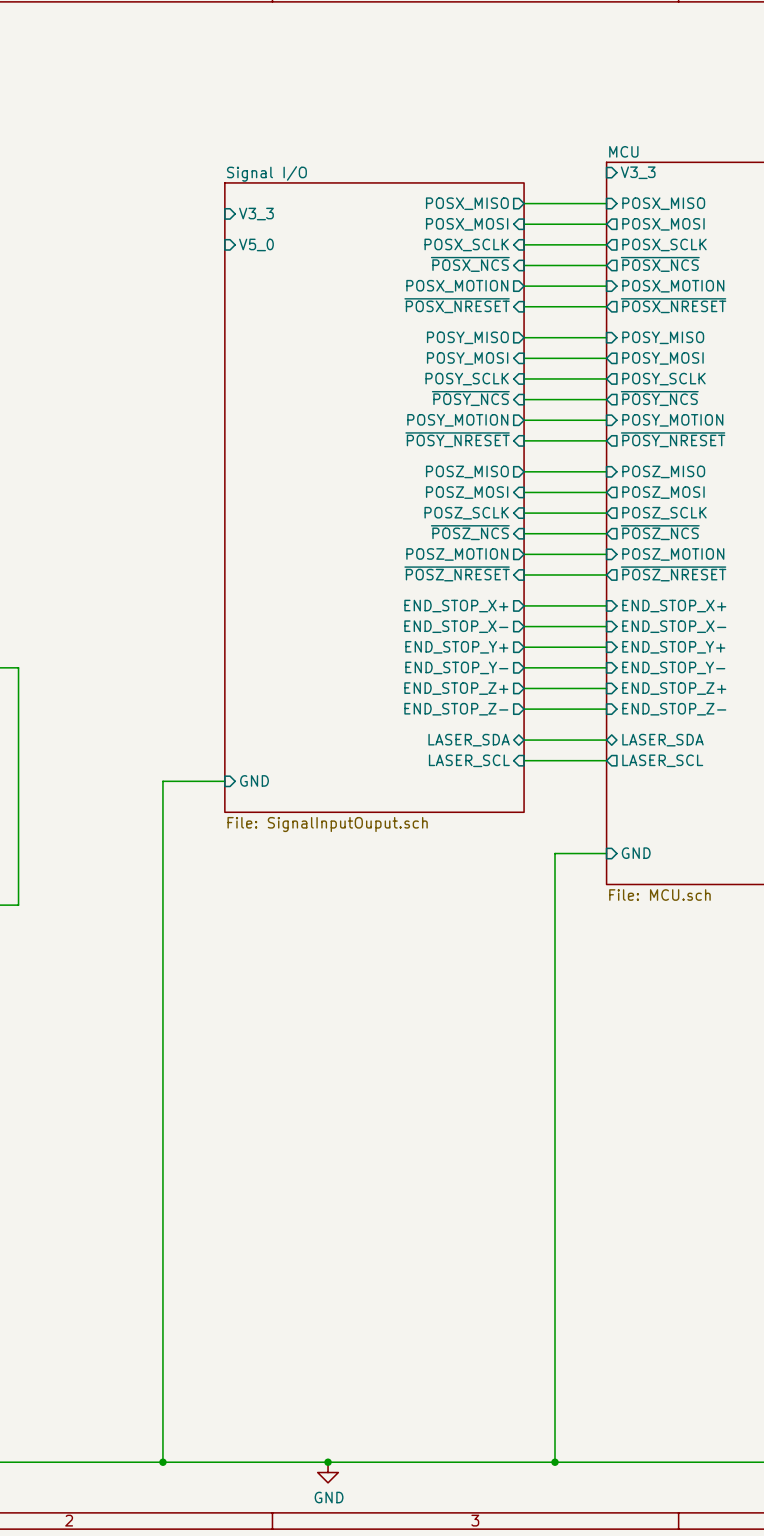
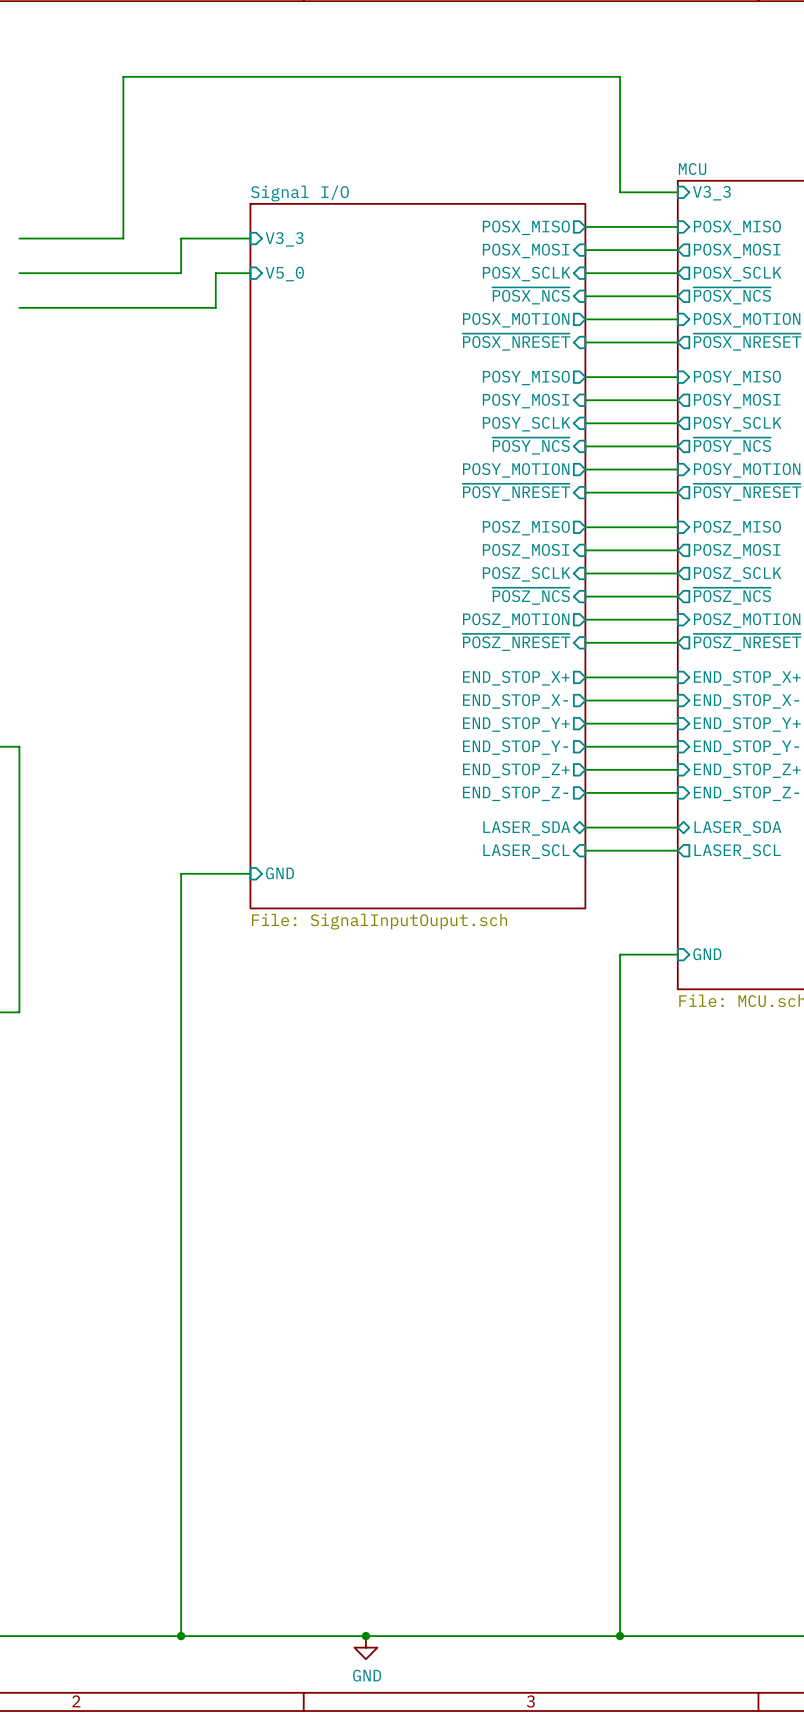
wire: none -> (677, 192) (620, 192) (620, 76) (123, 76) (123, 238) (19, 238)
wire: none -> (250, 238) (181, 238) (181, 273) (19, 273)
wire: none -> (250, 273) (215, 273) (215, 307) (19, 307)

